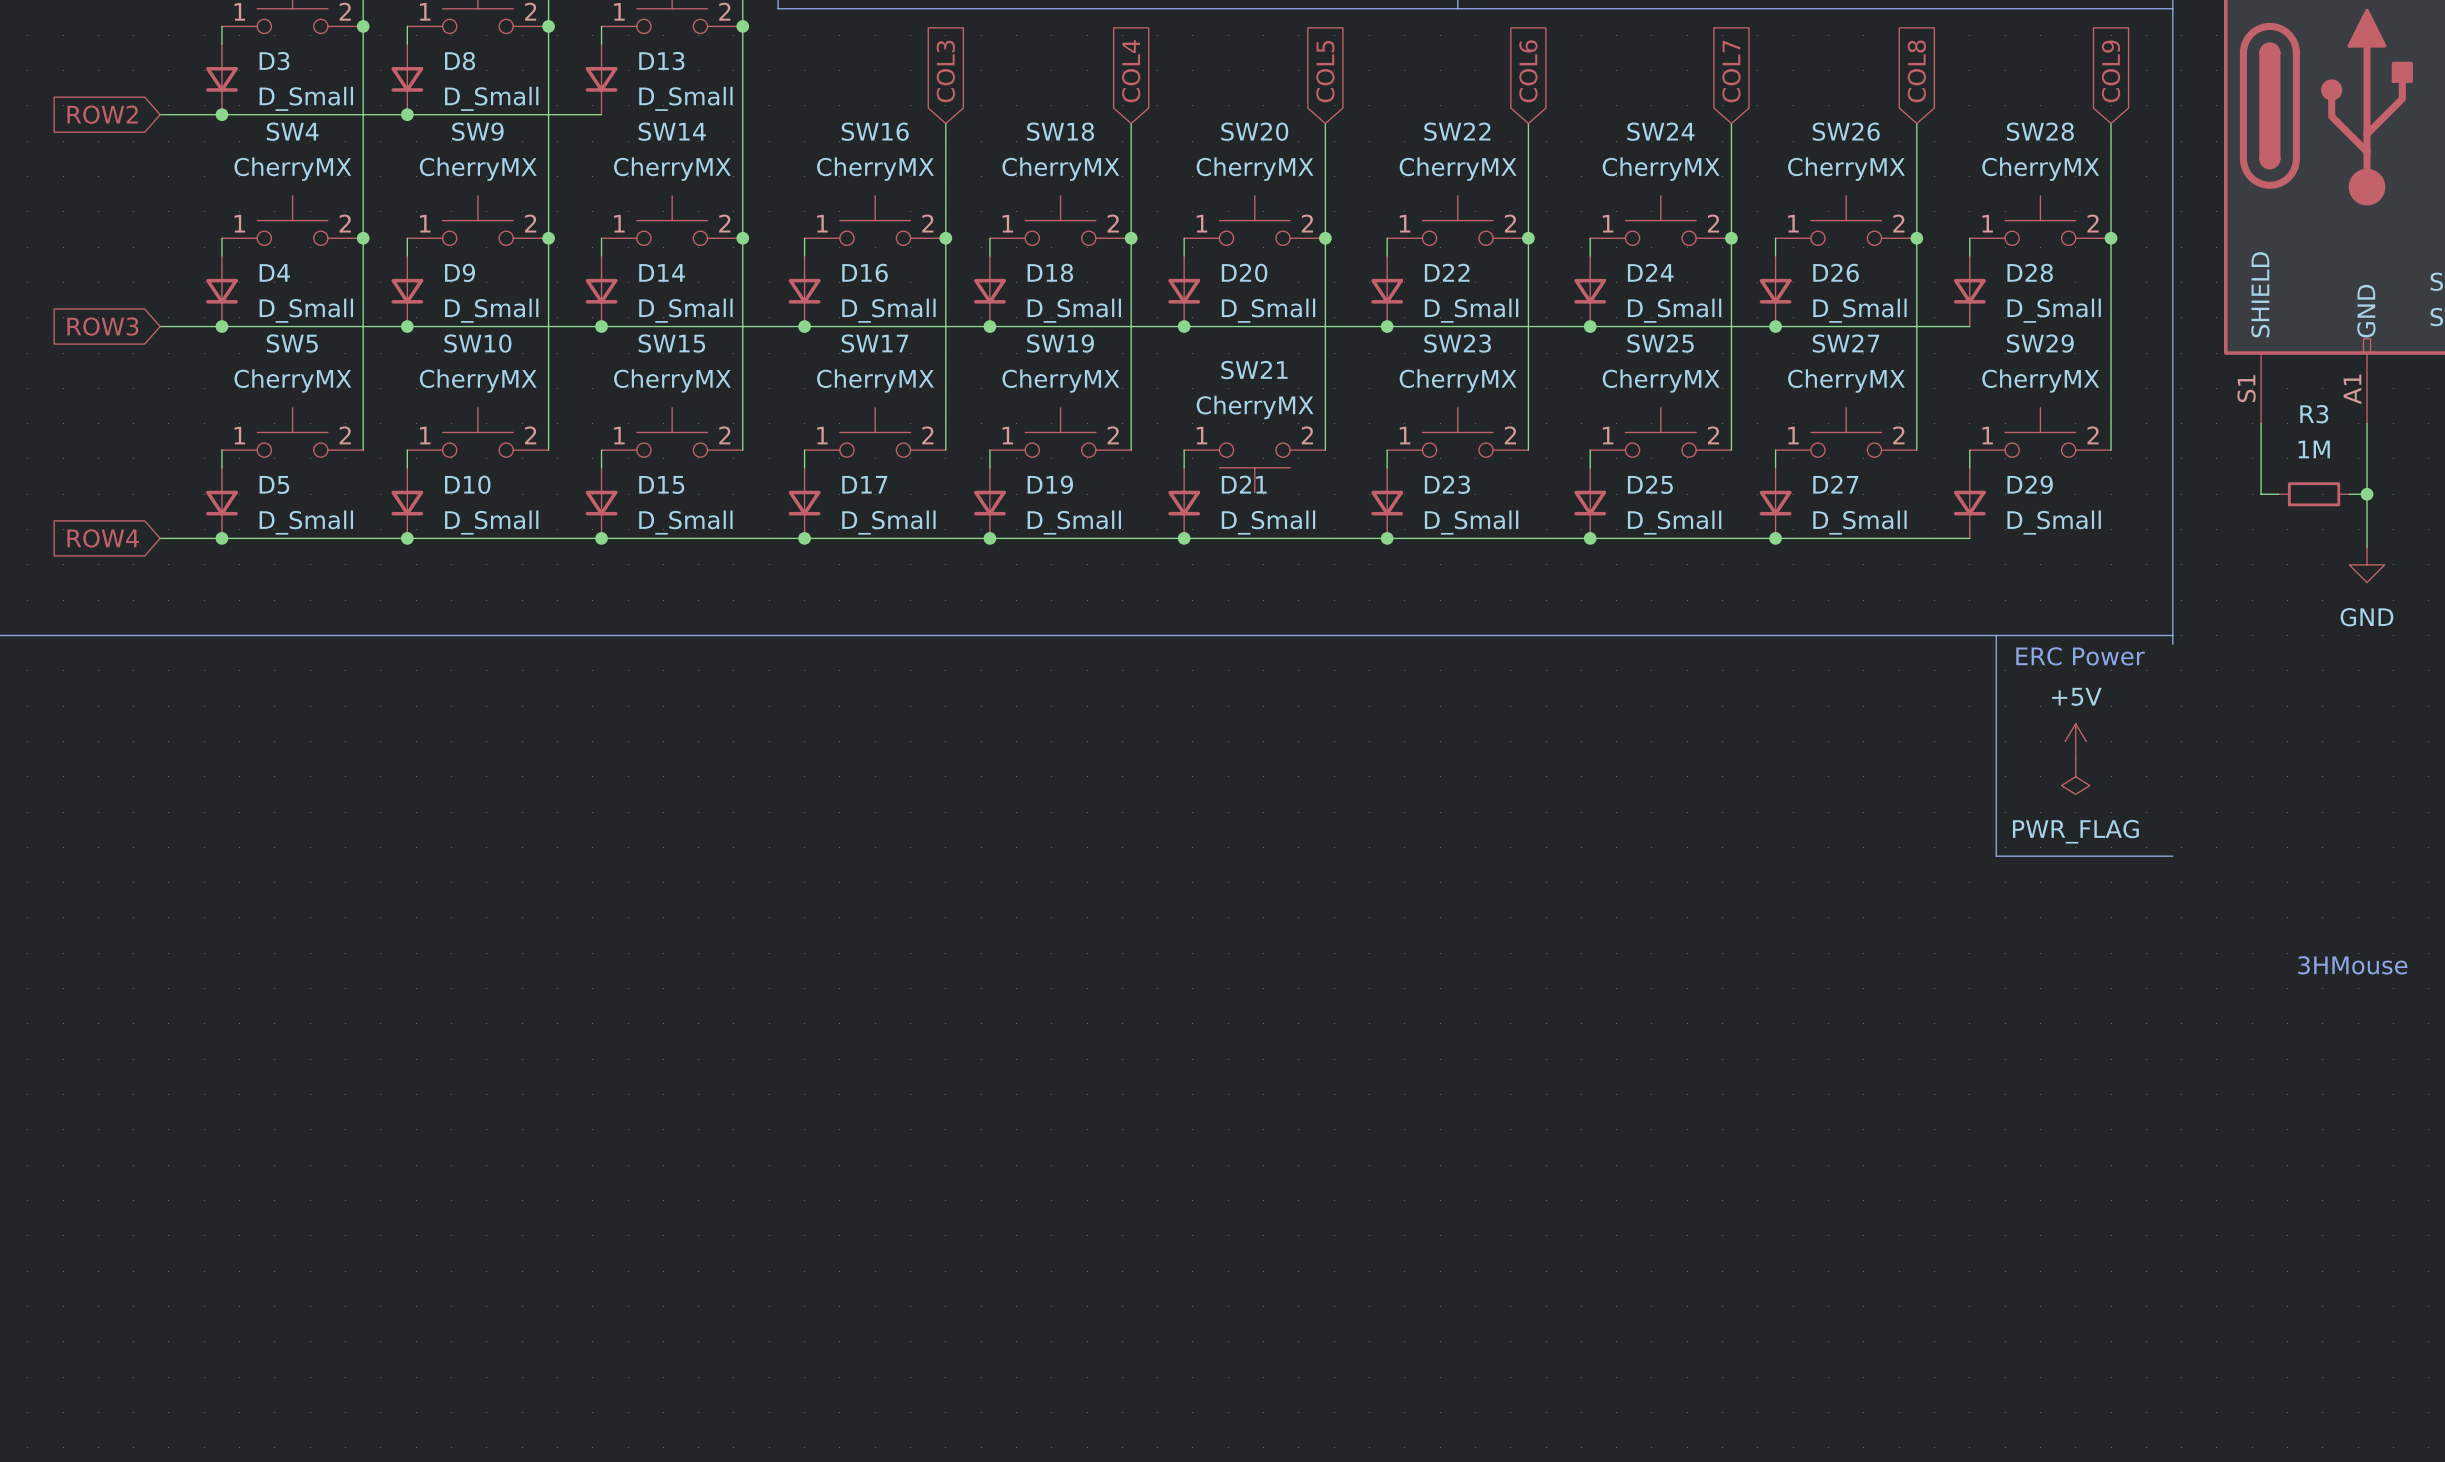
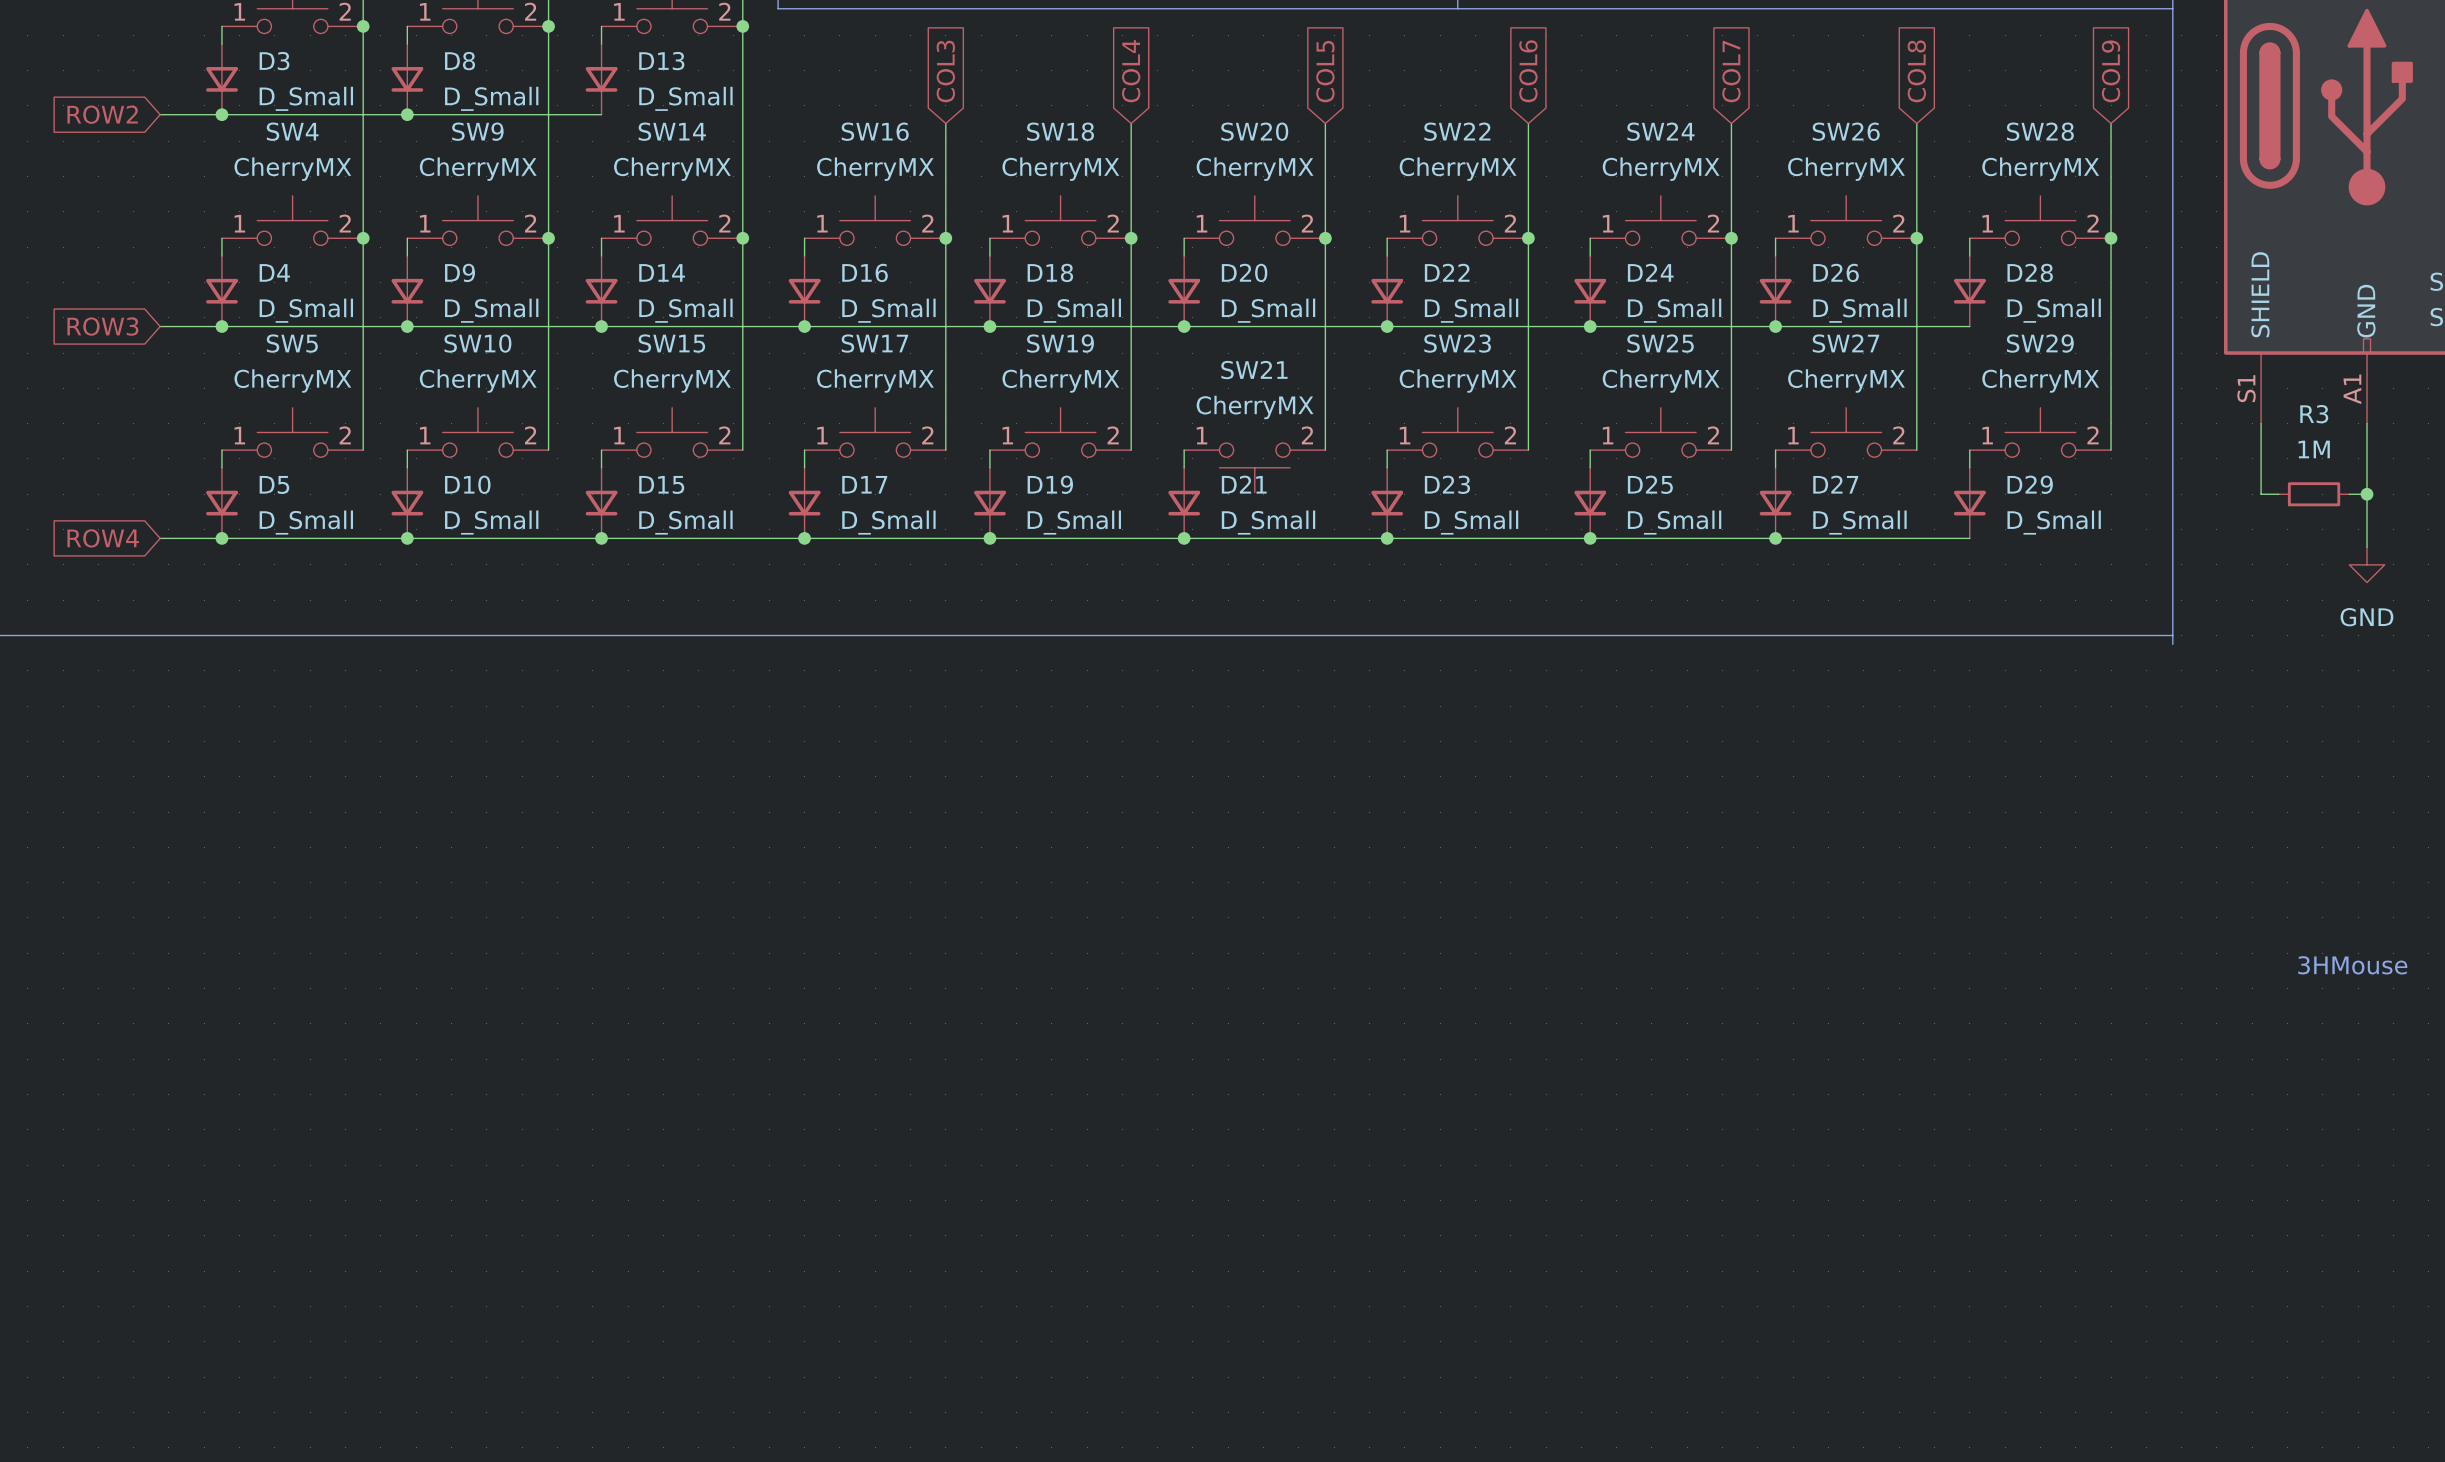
line: (1996, 635) (1996, 856) (2172, 856) -> none
text: ERC Power (2080, 656) -> none
power symbol: +5V (2075, 741) -> none
power symbol: PWR_FLAG (2075, 776) -> none

